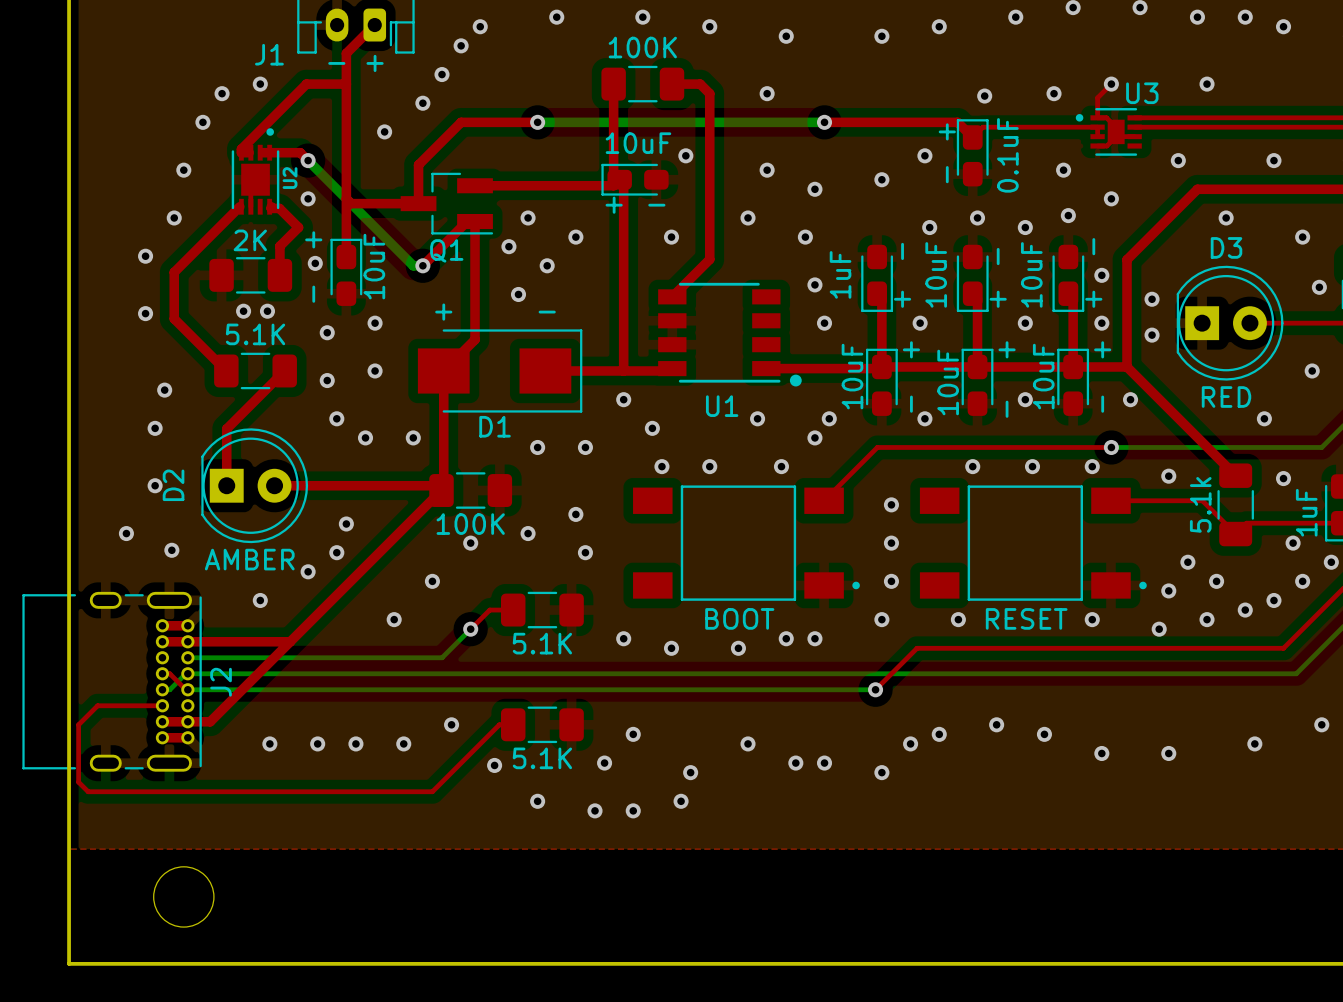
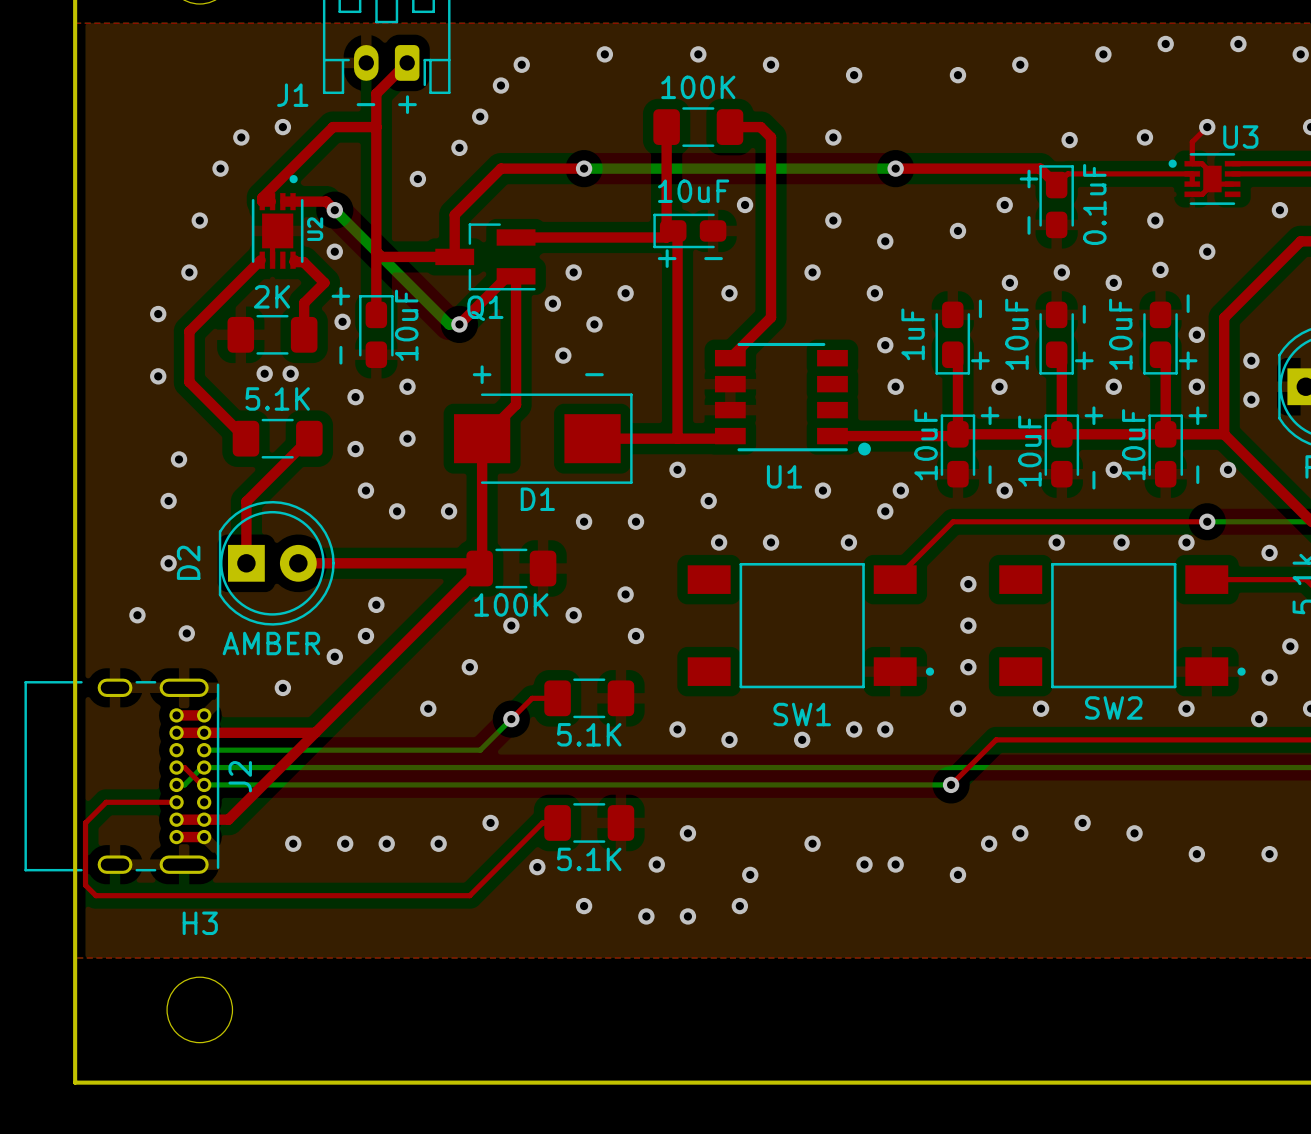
SW1 text: BOOT (739, 618) -> none
SW2 name: none -> SW2 (1113, 707)
SW2 text: RESET (1026, 618) -> none
SW1 name: none -> SW1 (802, 714)
H3 name: none -> H3 (200, 923)

